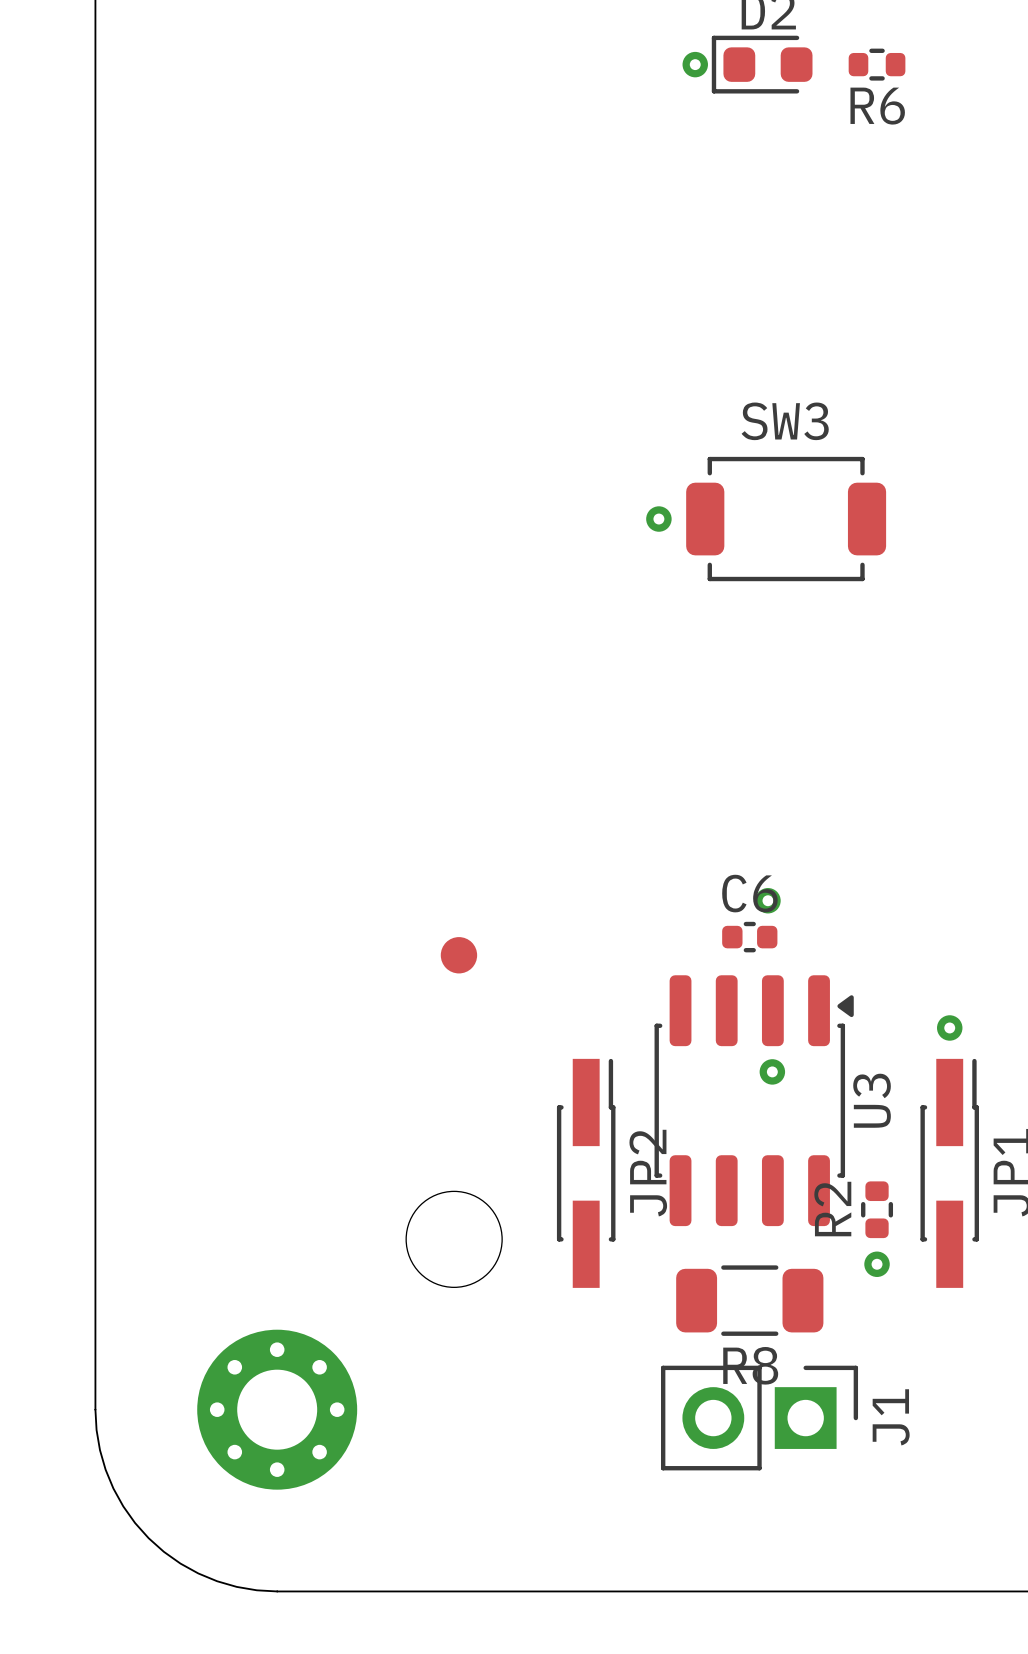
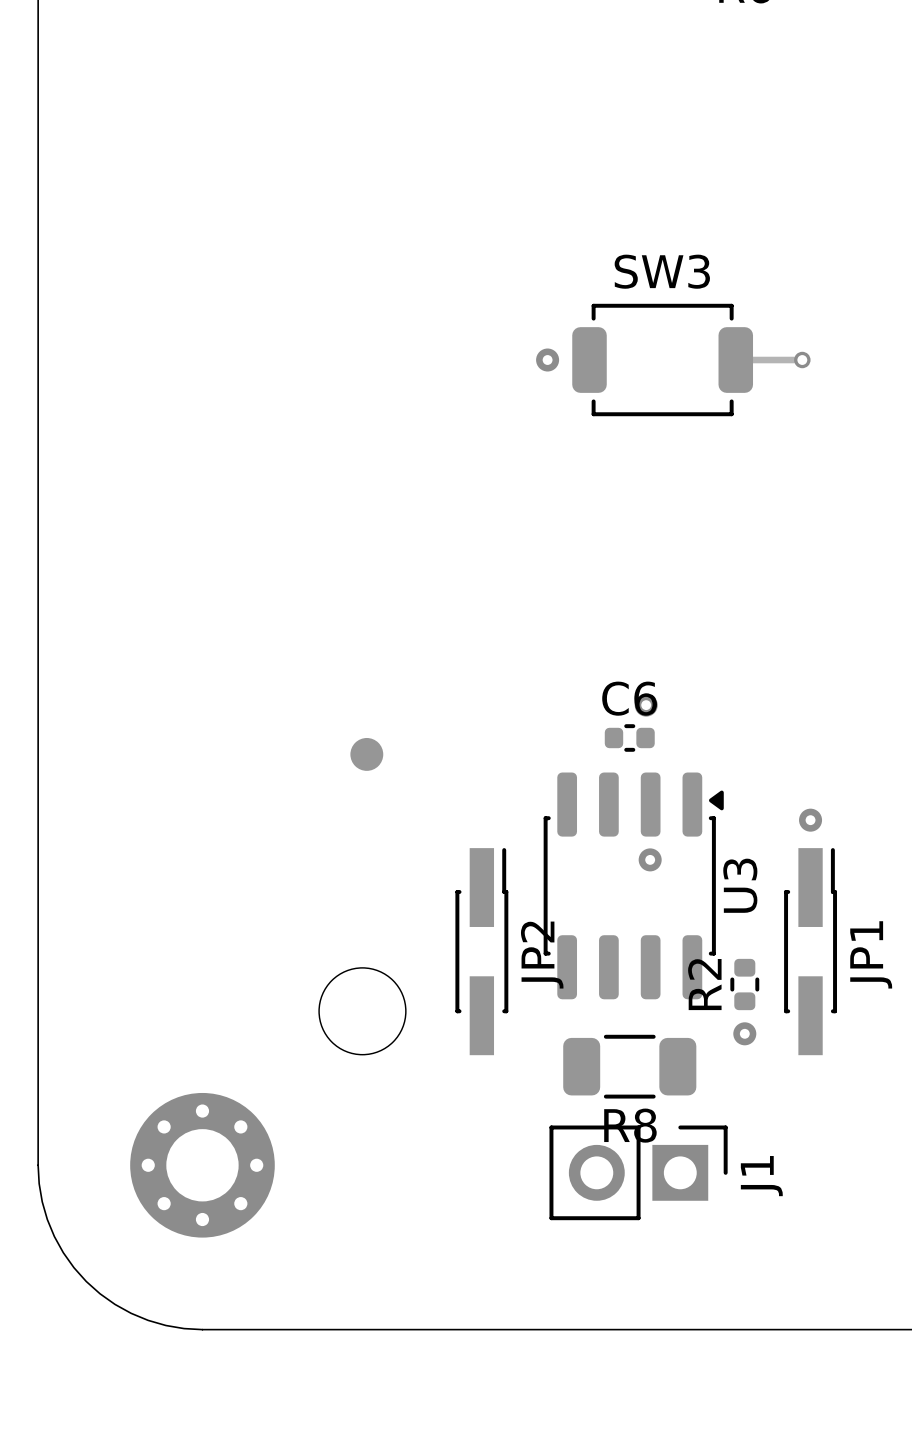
track: none -> (735, 360) (802, 360)
via: none -> (802, 360)

